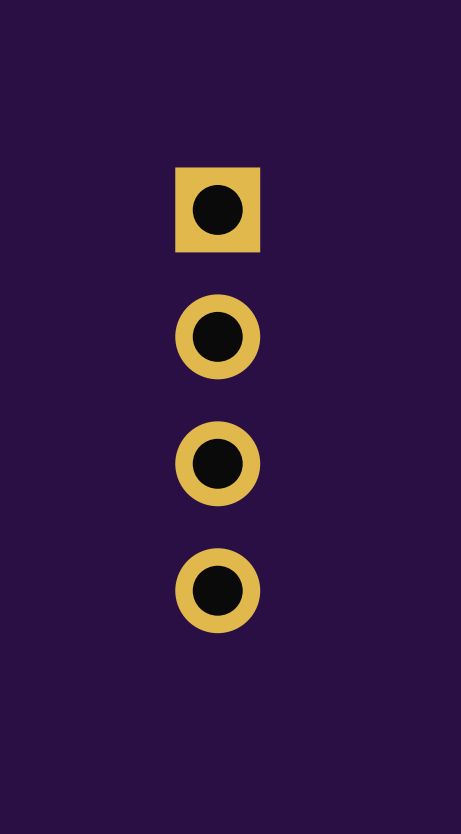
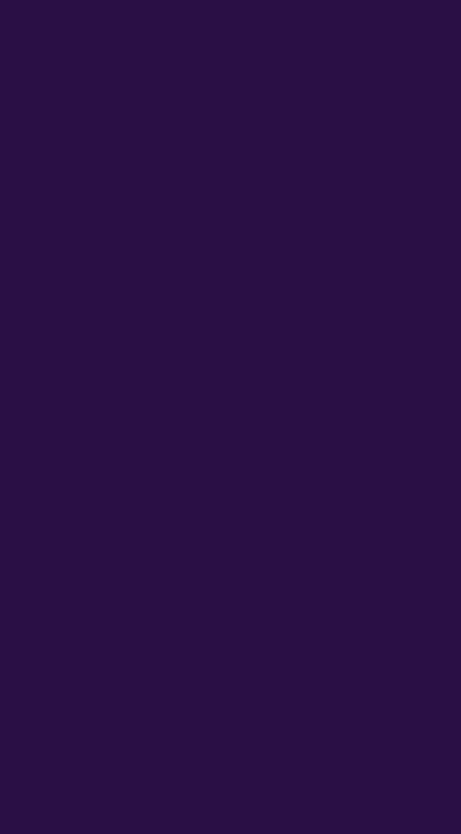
part: (217, 400) -> none

